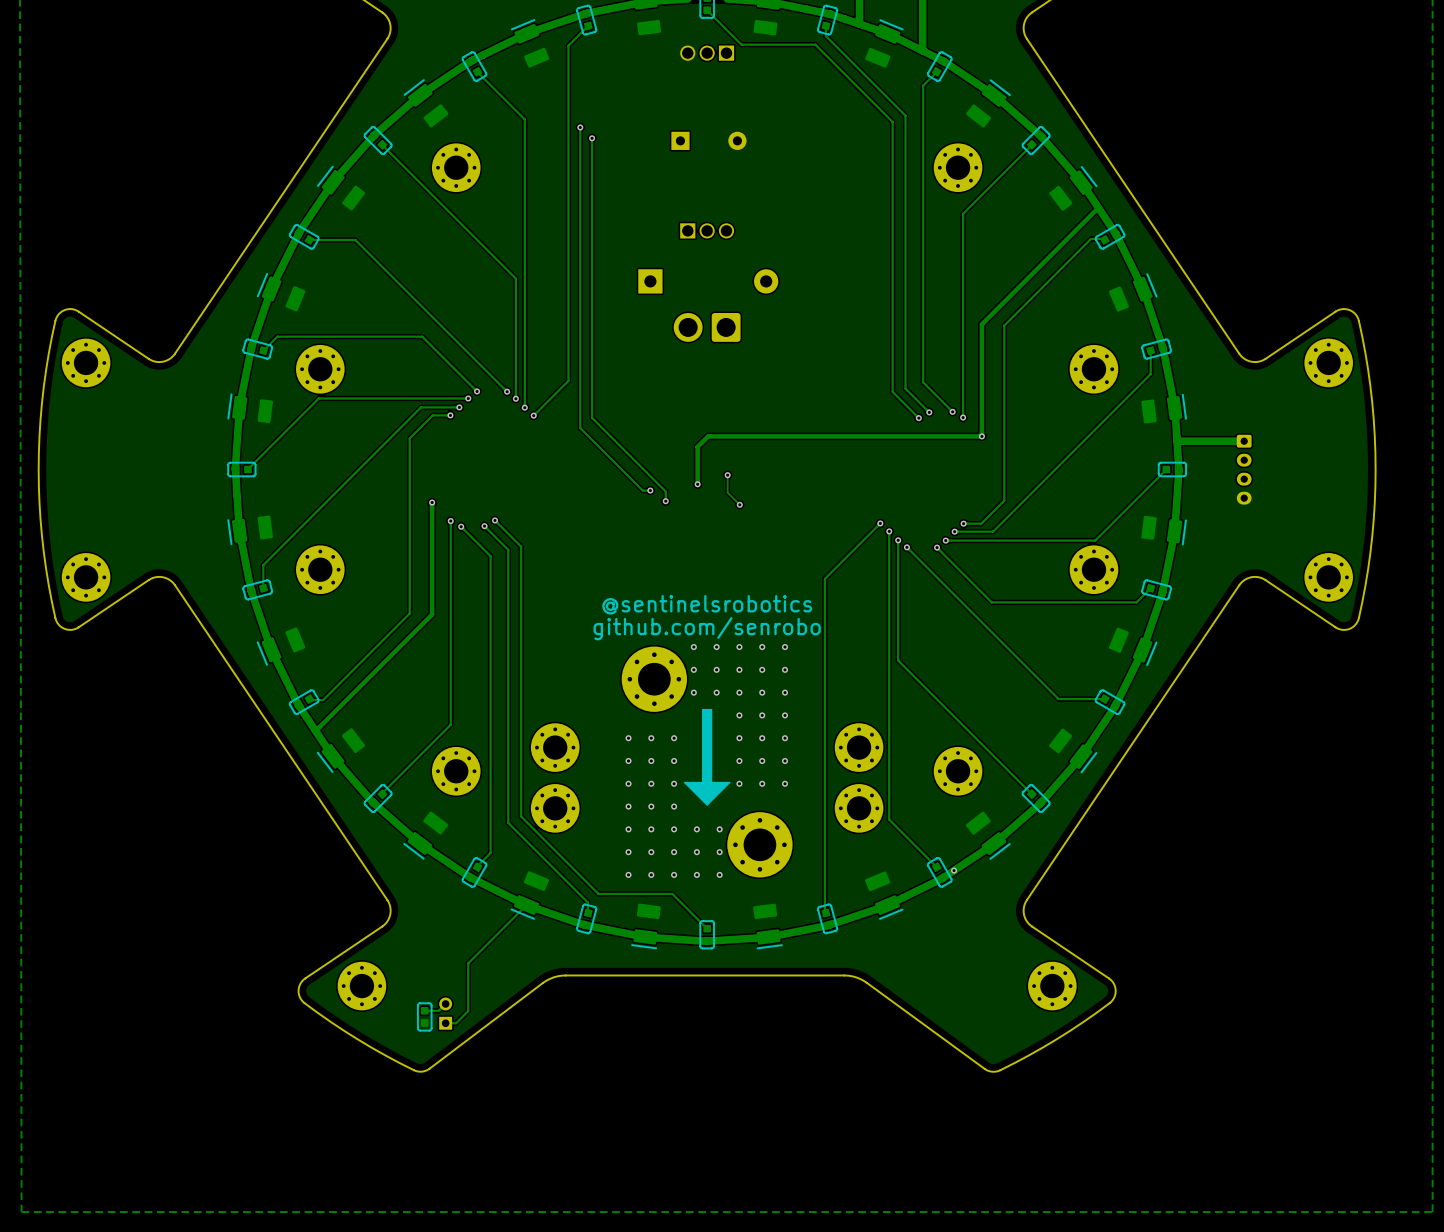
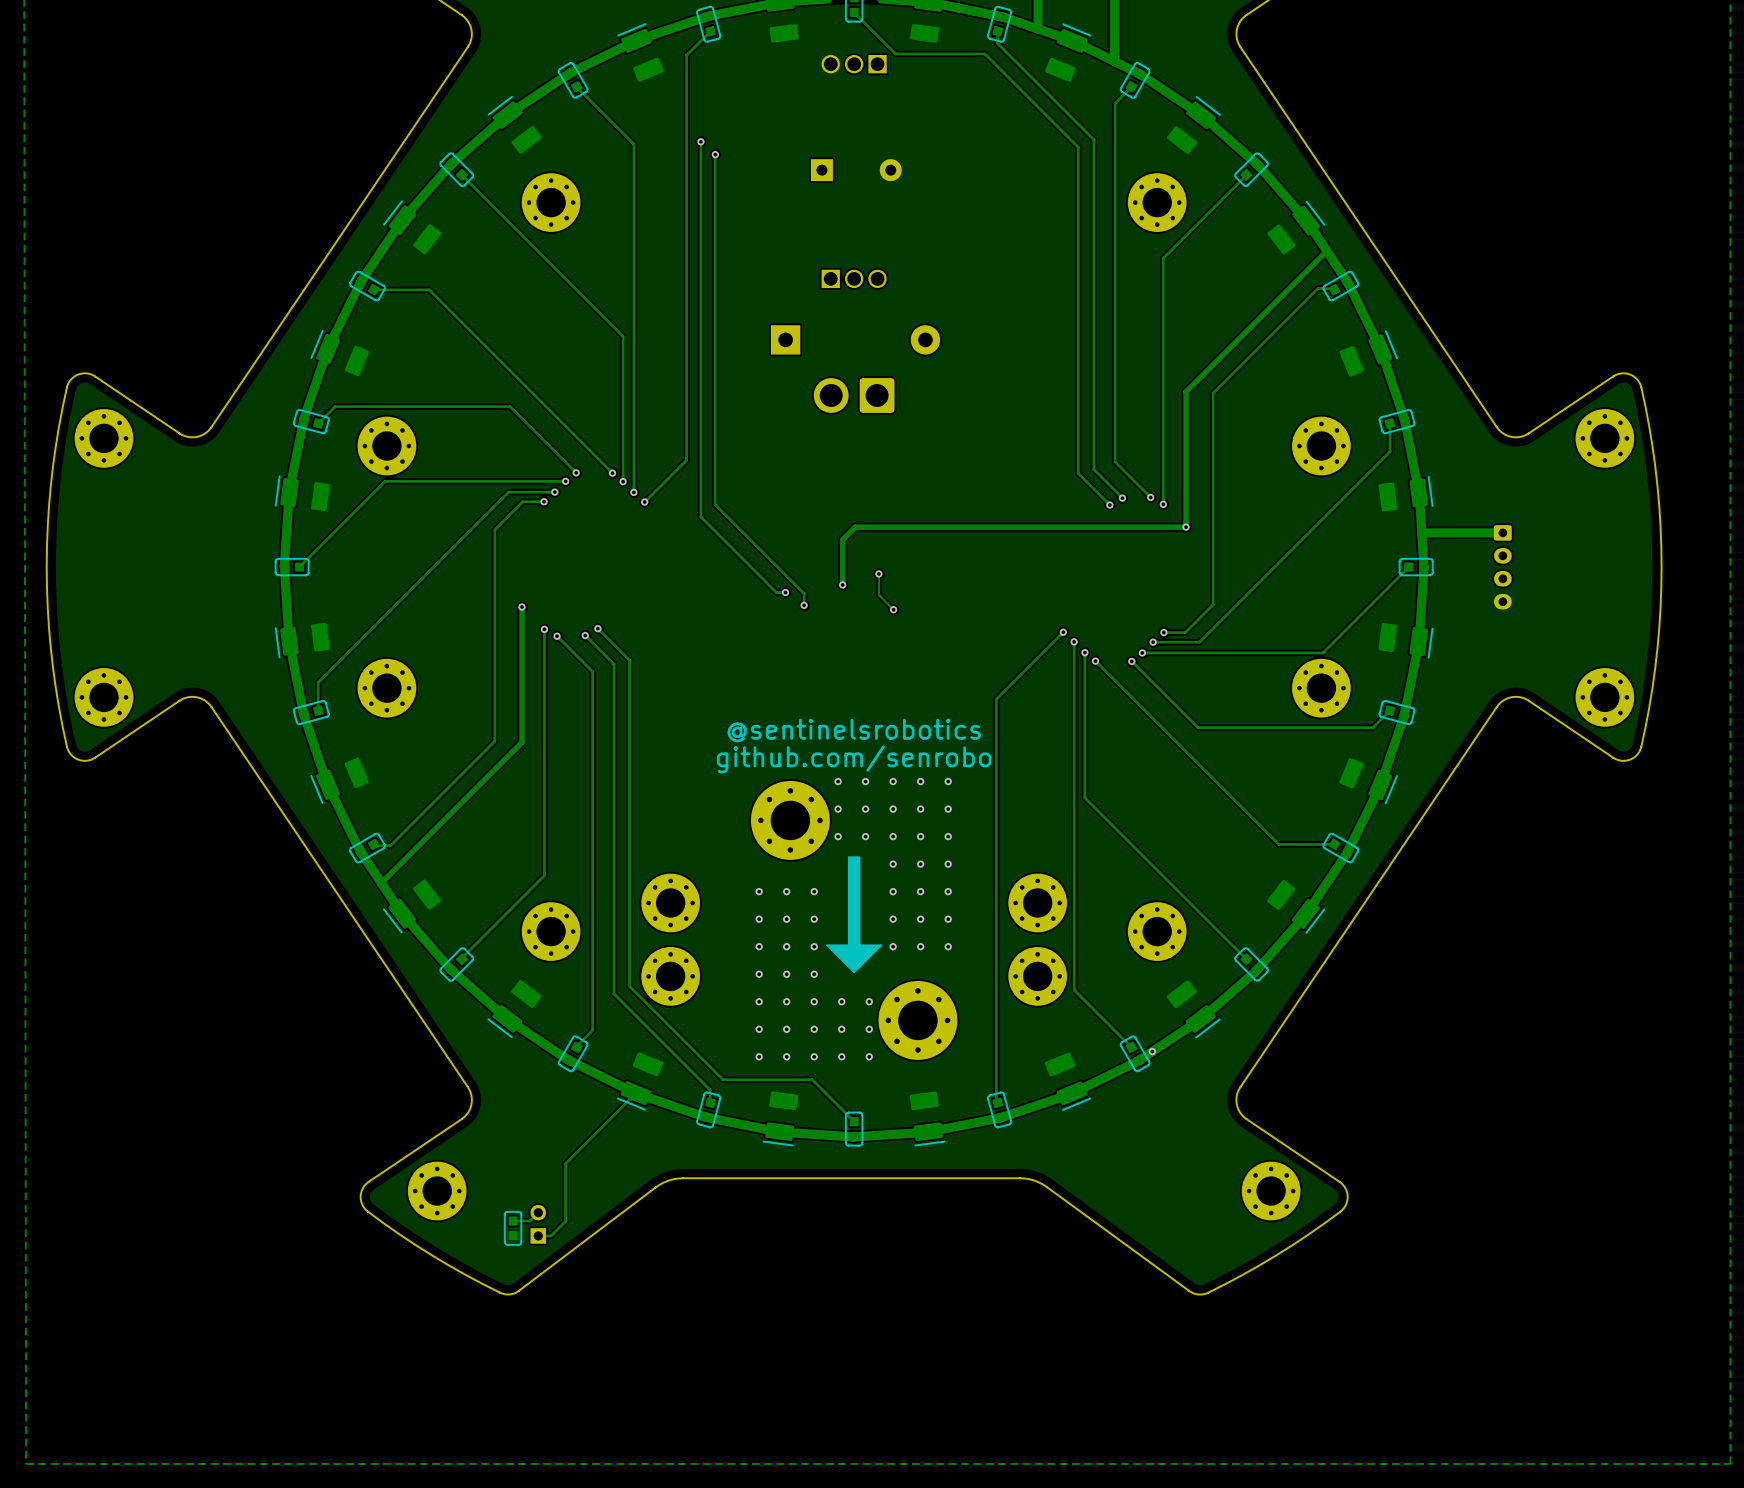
track: none -> (700, 141) (700, 153)
via: none -> (700, 141)
via: (580, 127) -> none
track: none -> (715, 154) (715, 167)
via: none -> (715, 154)
via: (592, 138) -> none

